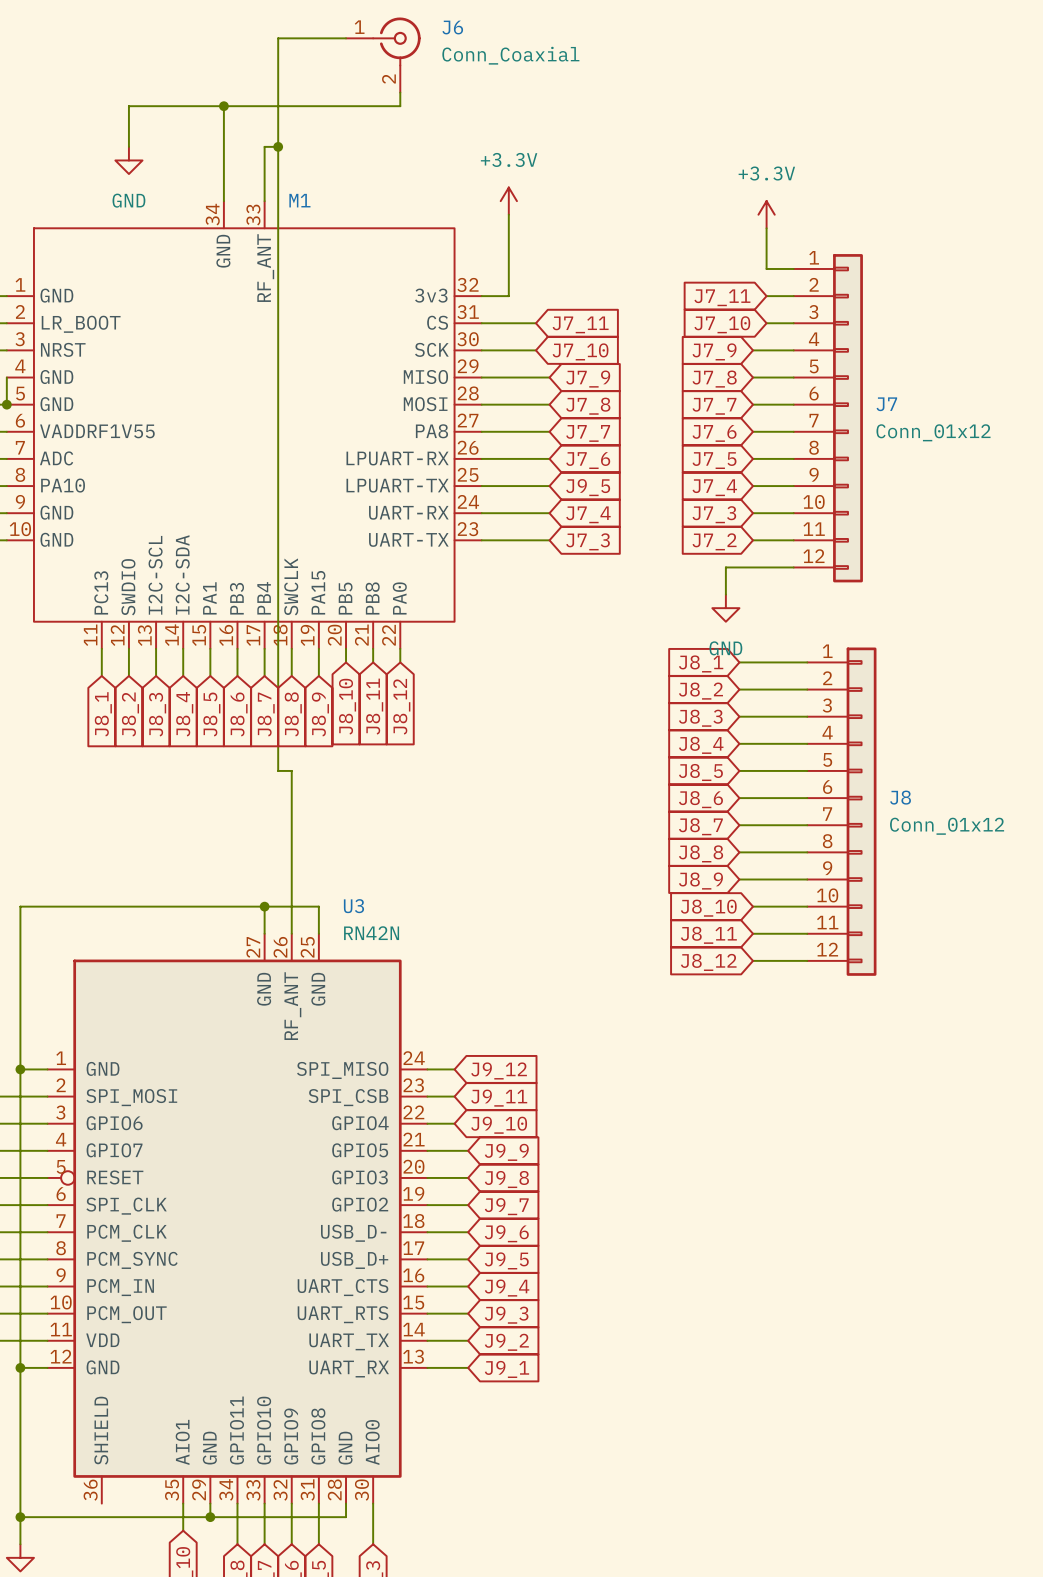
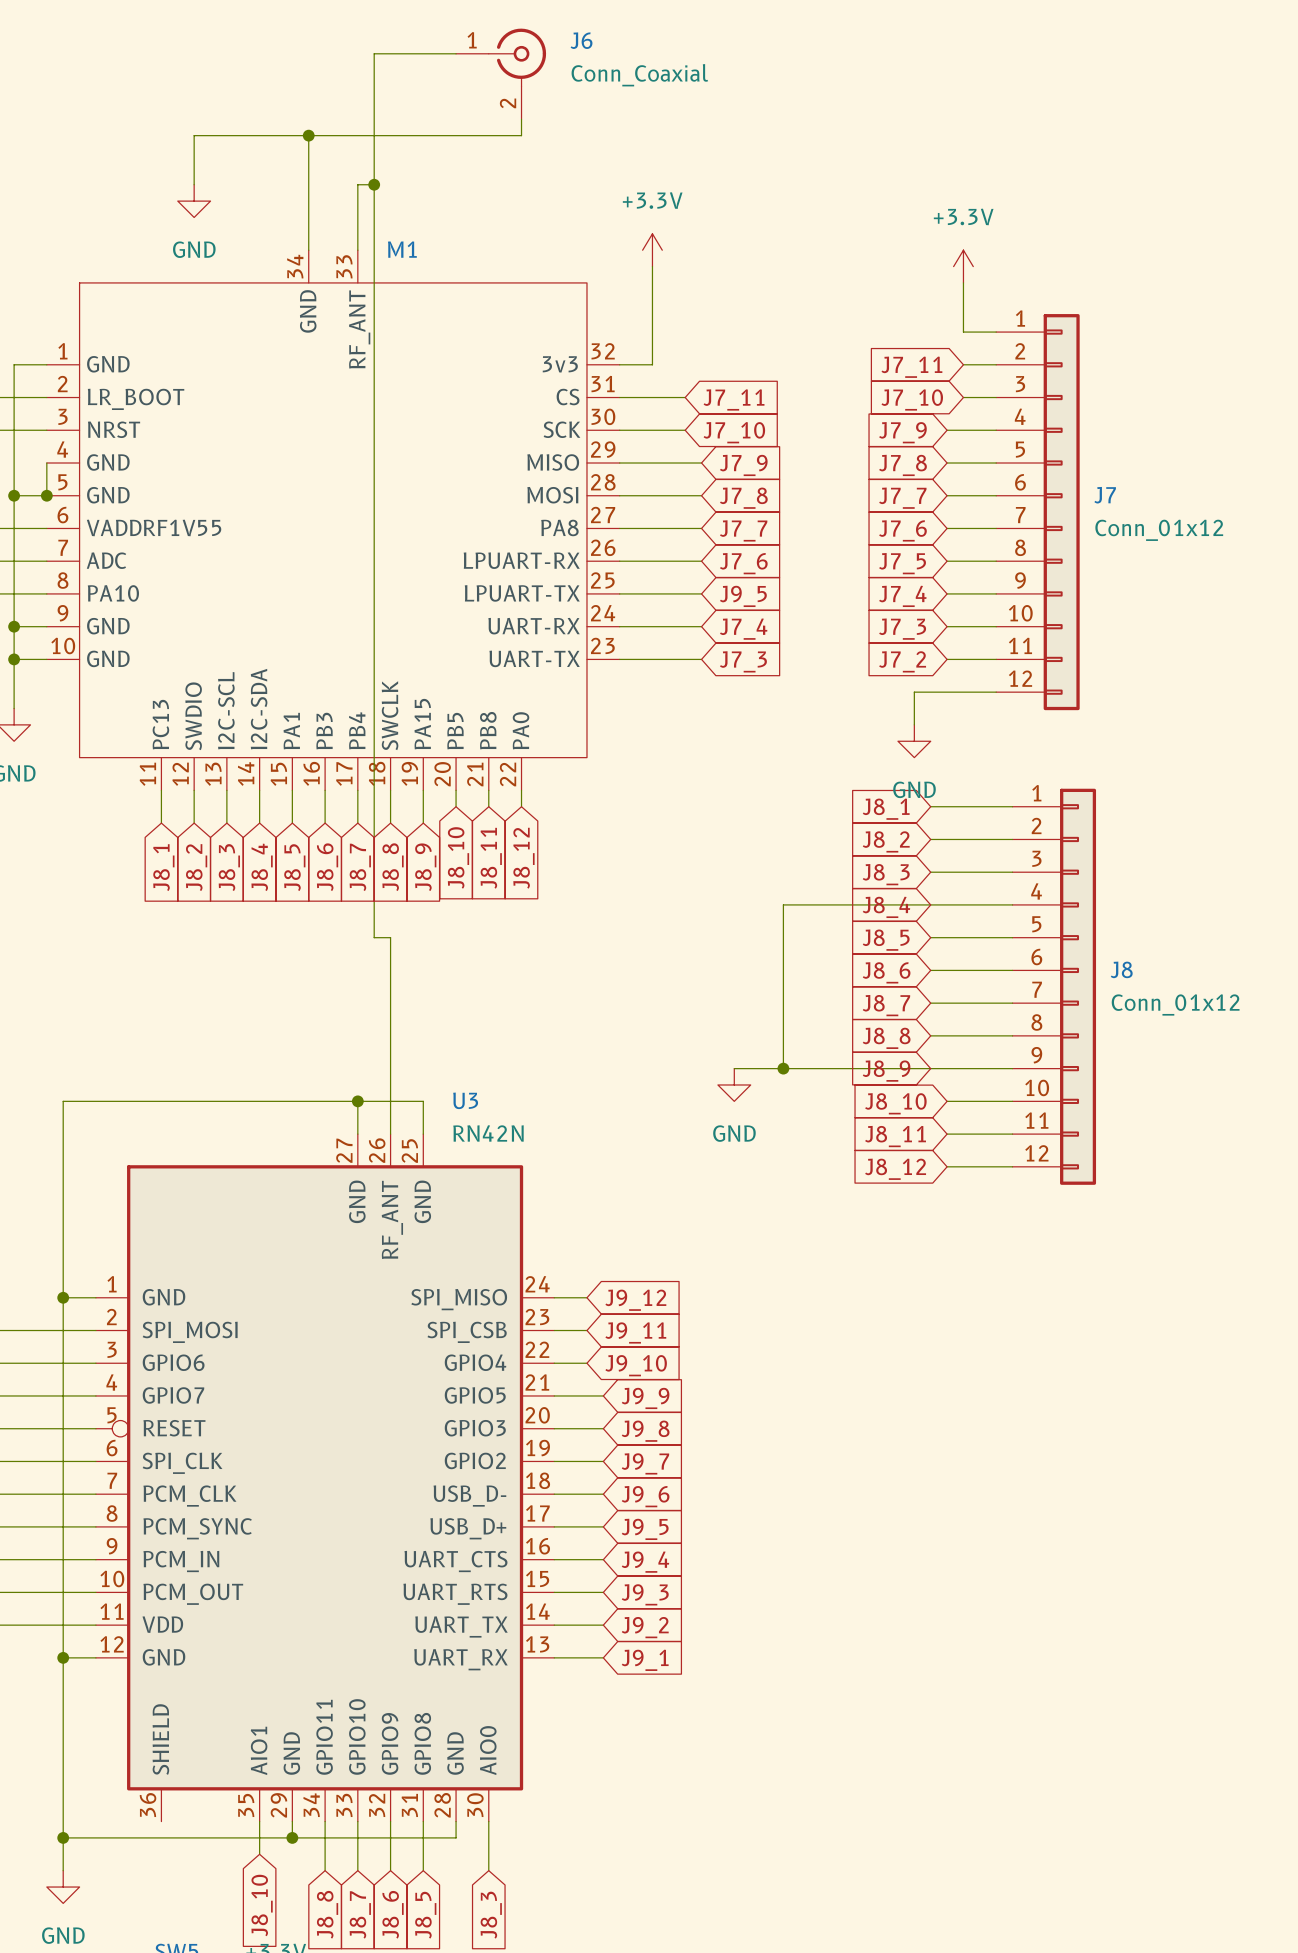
wire: none -> (930, 904) (783, 904) (783, 1068)
wire: none -> (734, 1068) (930, 1068)
junction: none -> (783, 1068)
power symbol: none -> GND (734, 1084)

